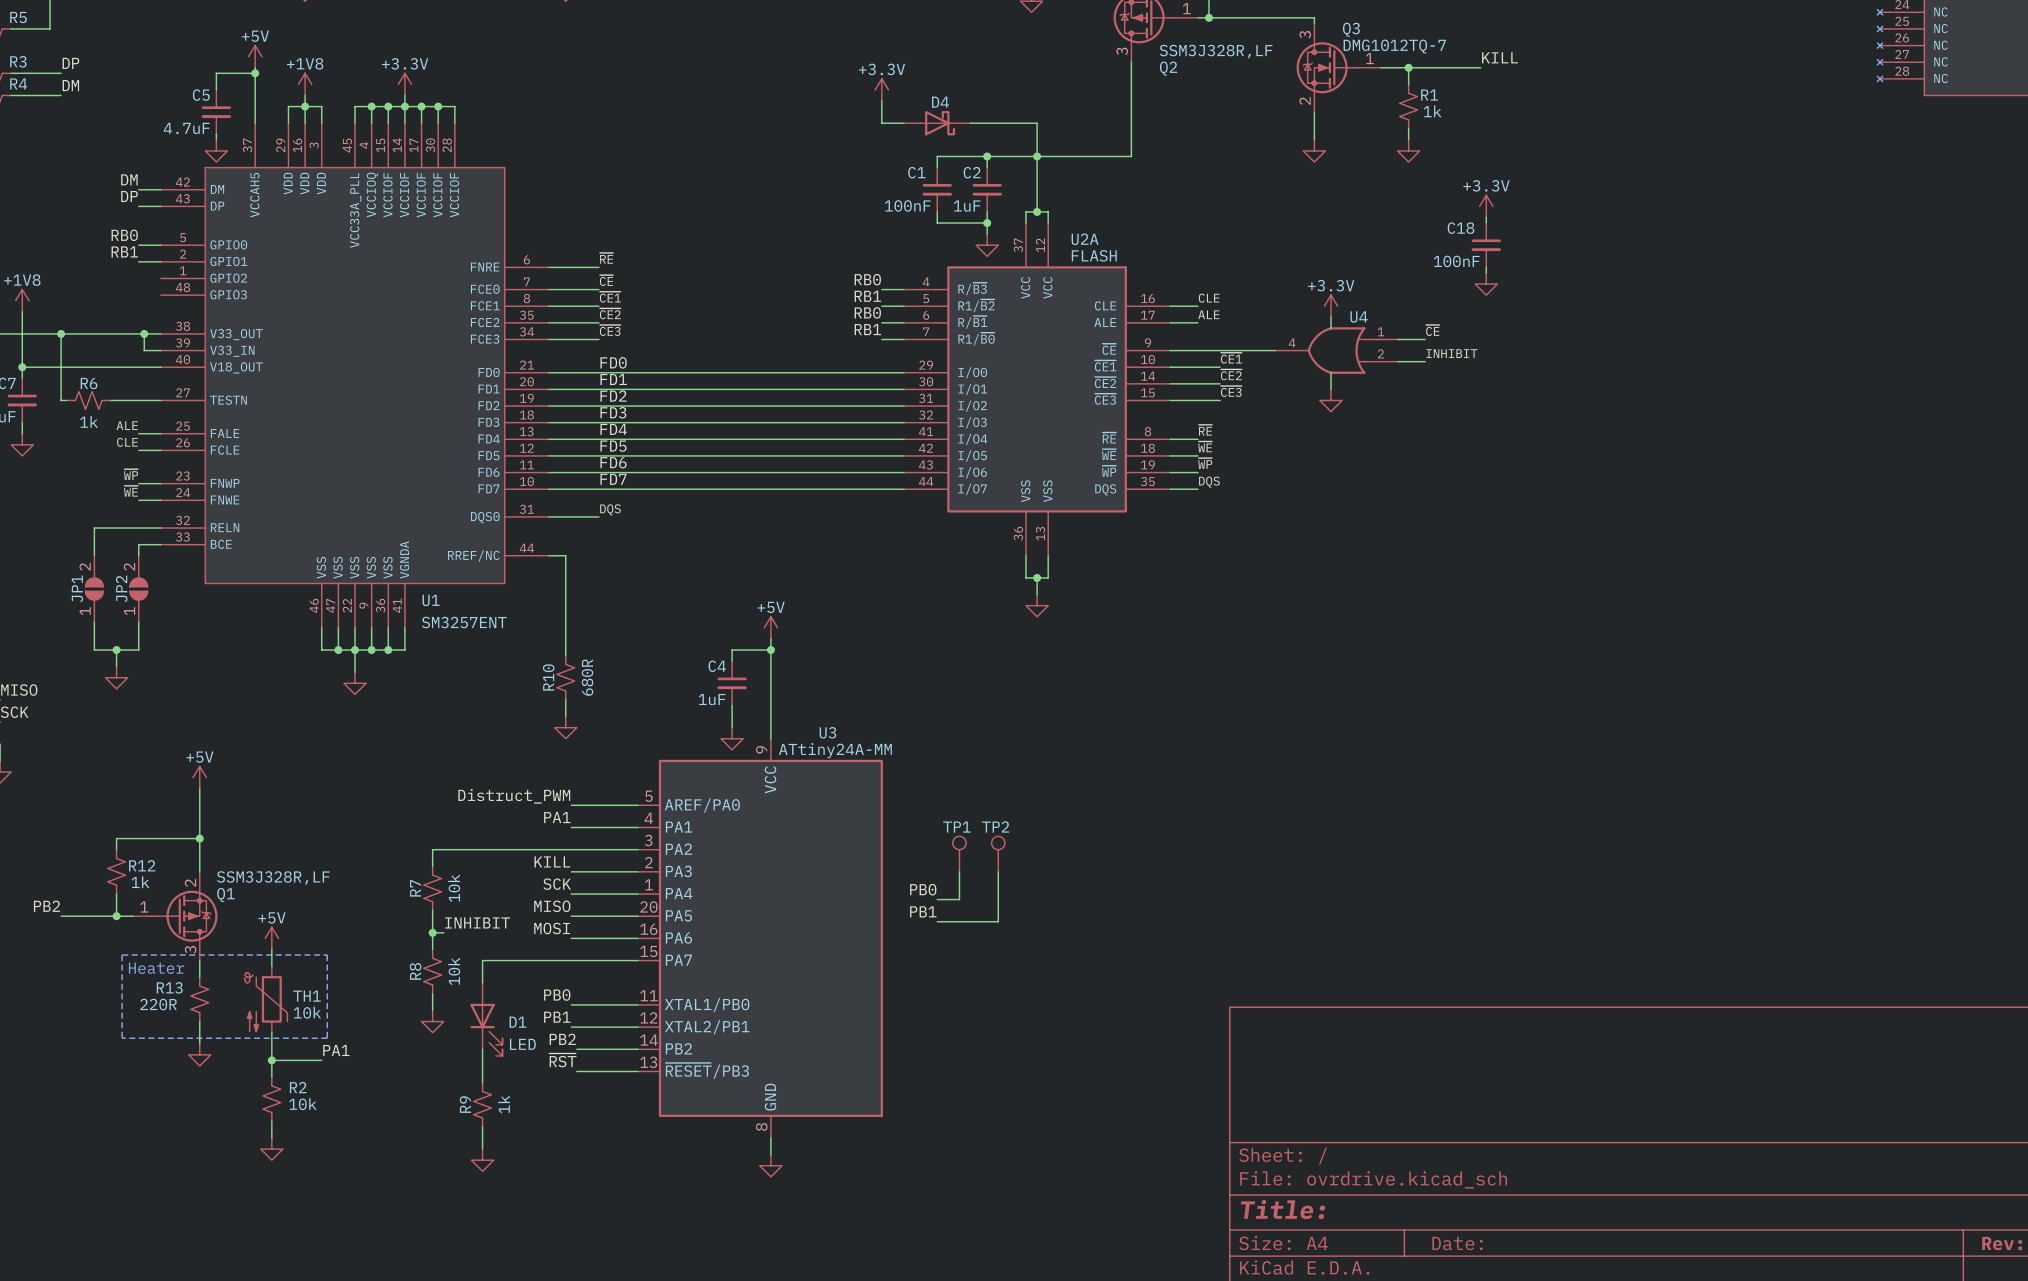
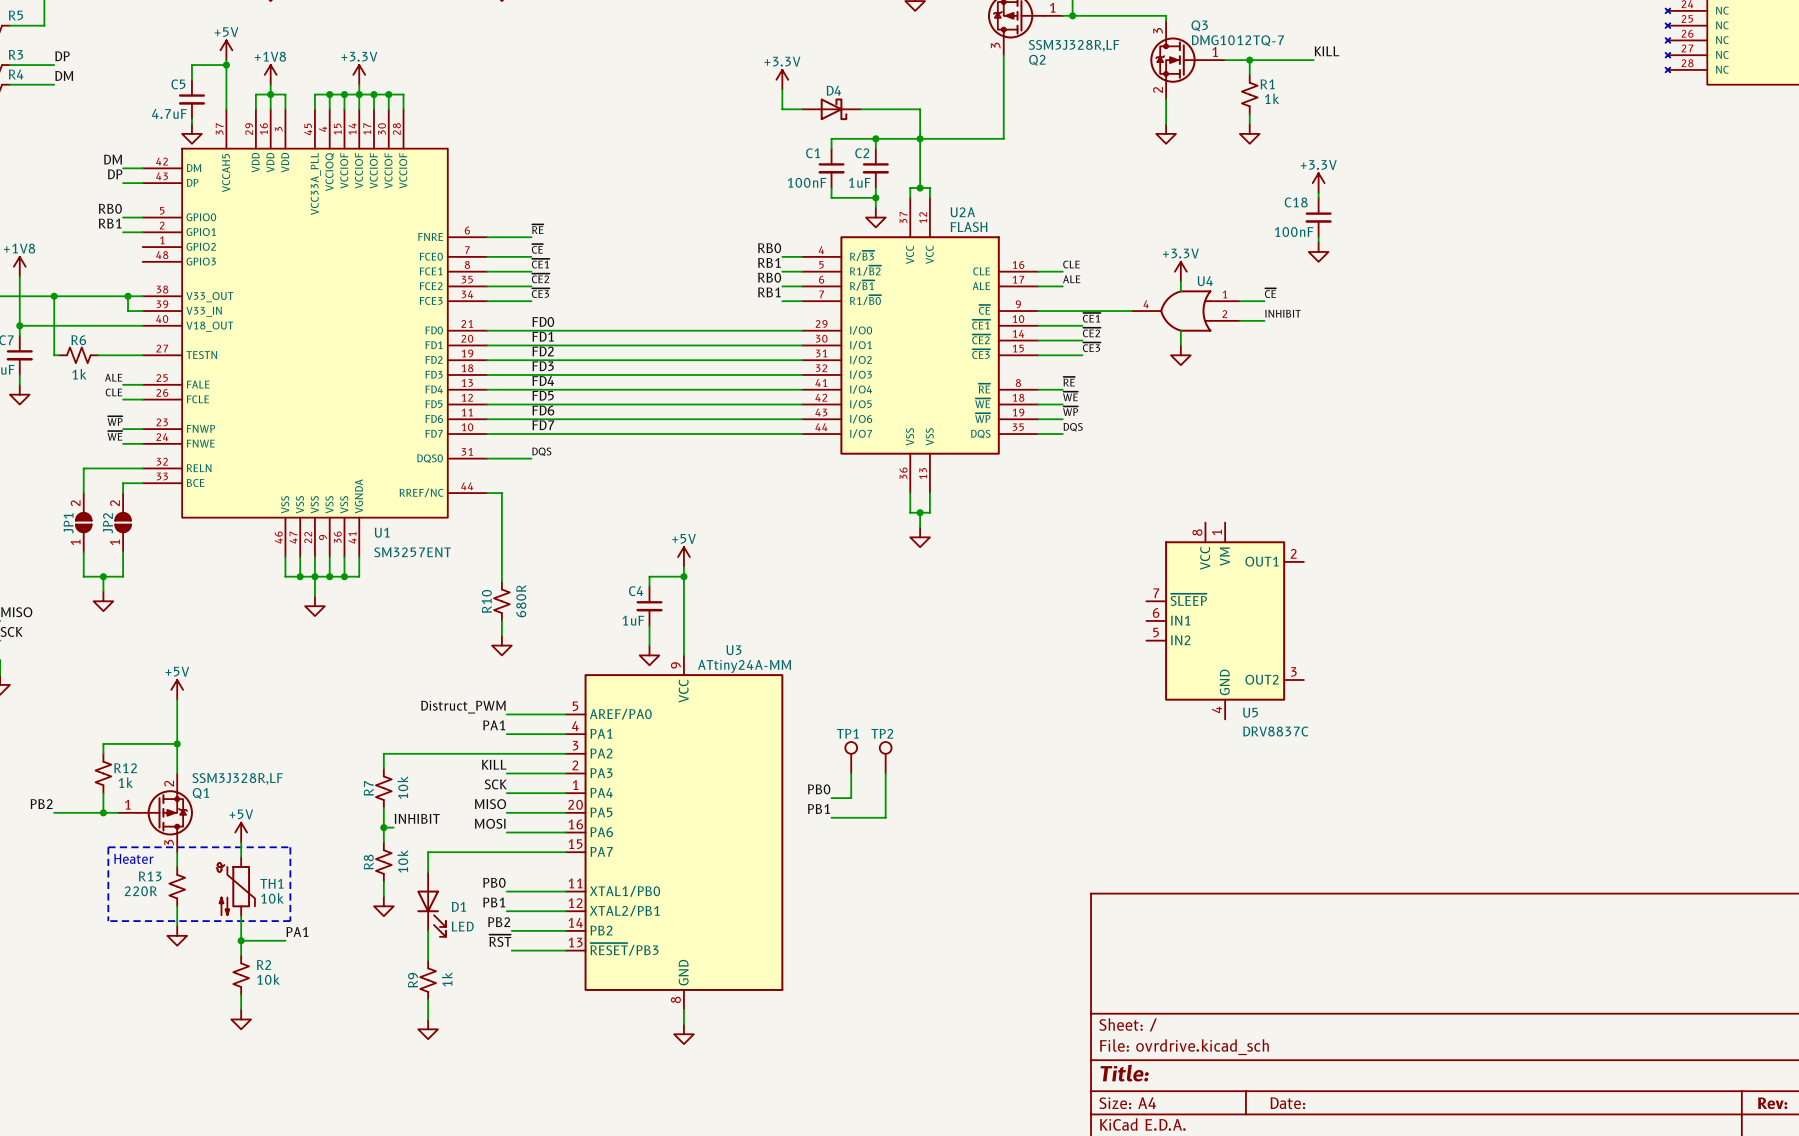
U5: none -> DRV8837C (1225, 620)

